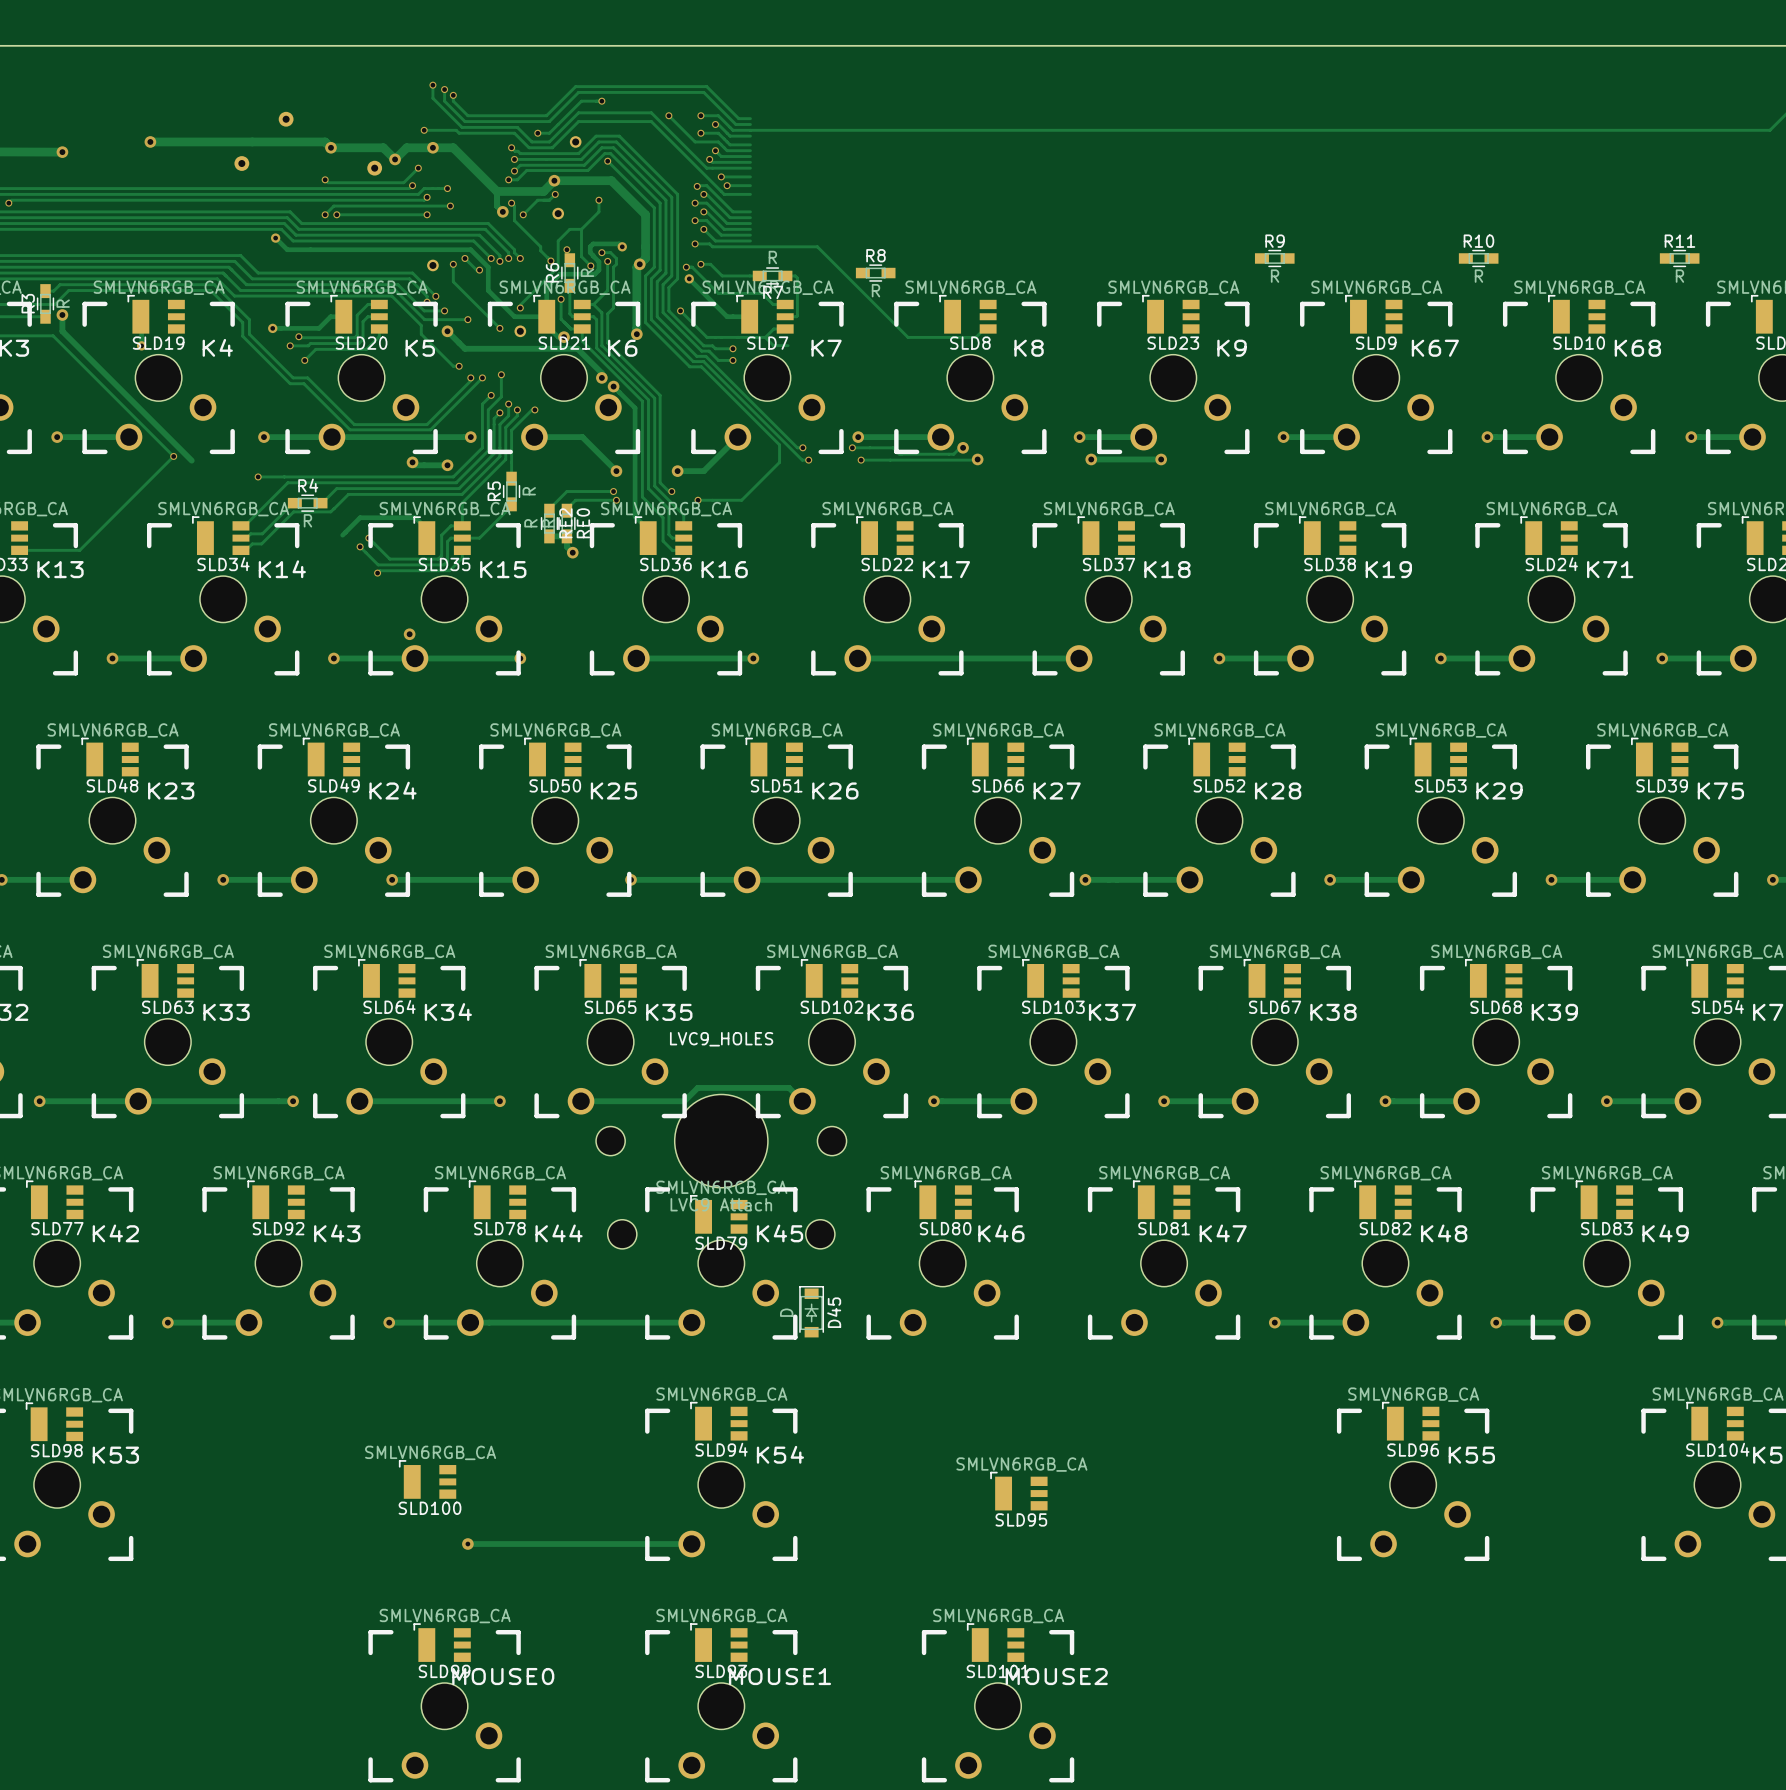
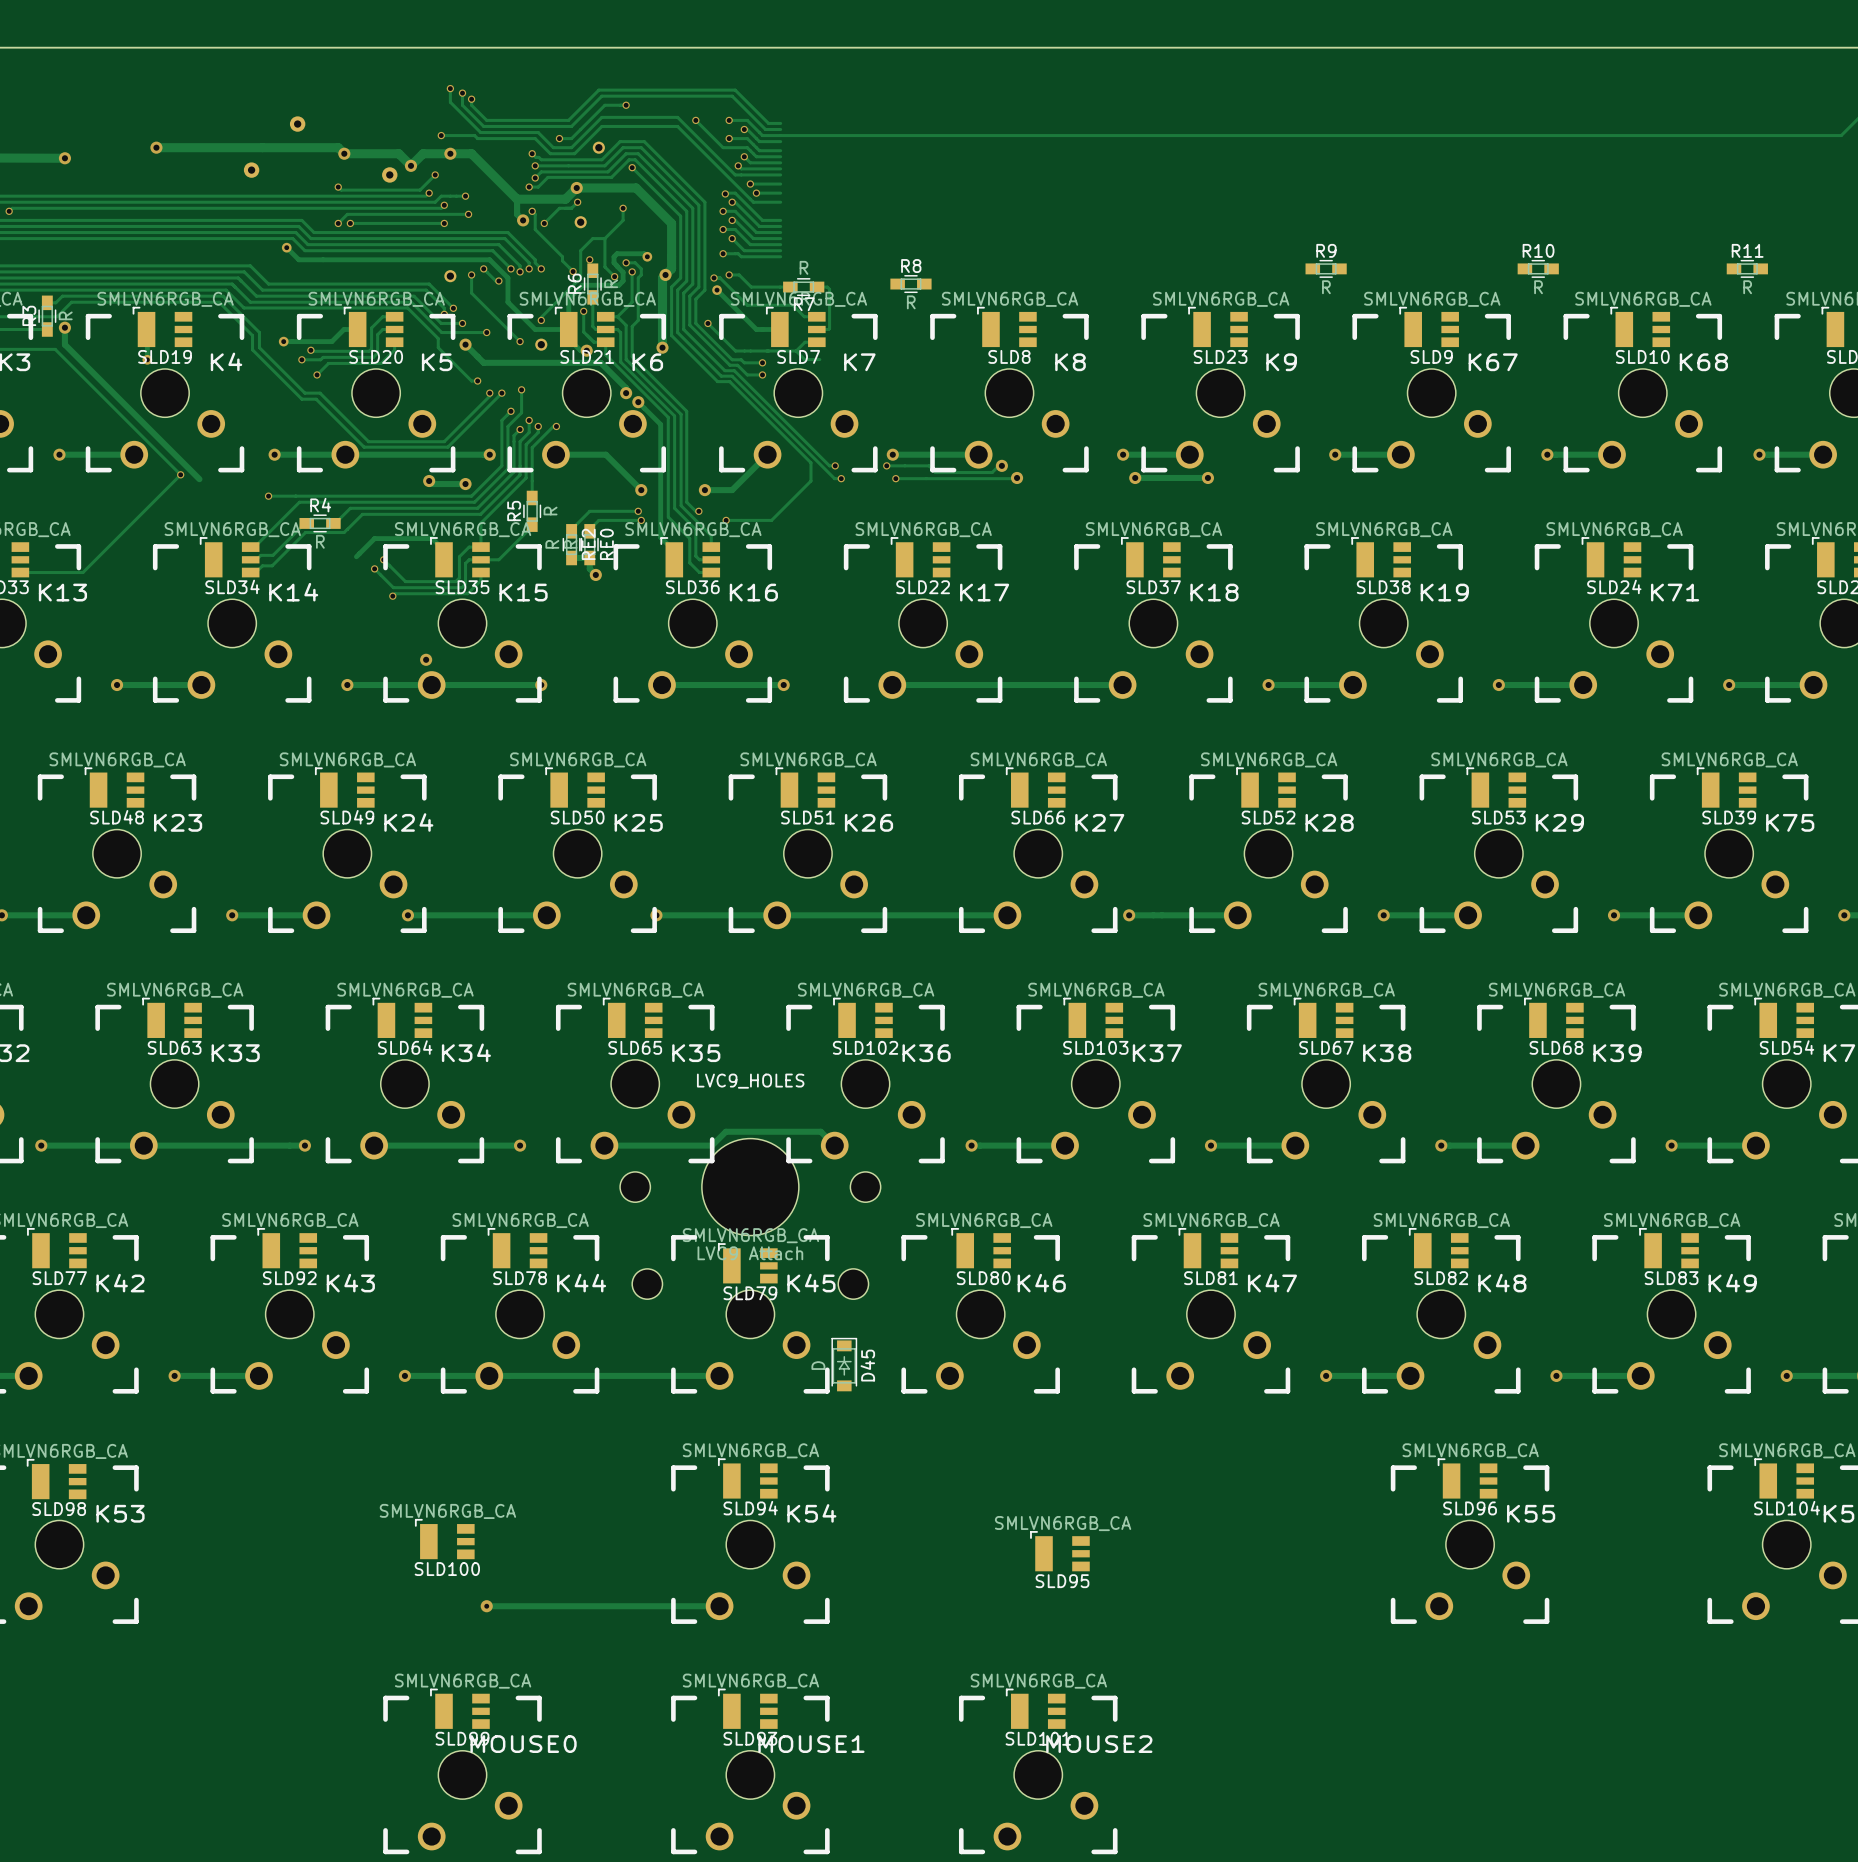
track: (750, 246) (817, 246) (908, 337) (975, 337) (984, 328) (988, 328) -> none

